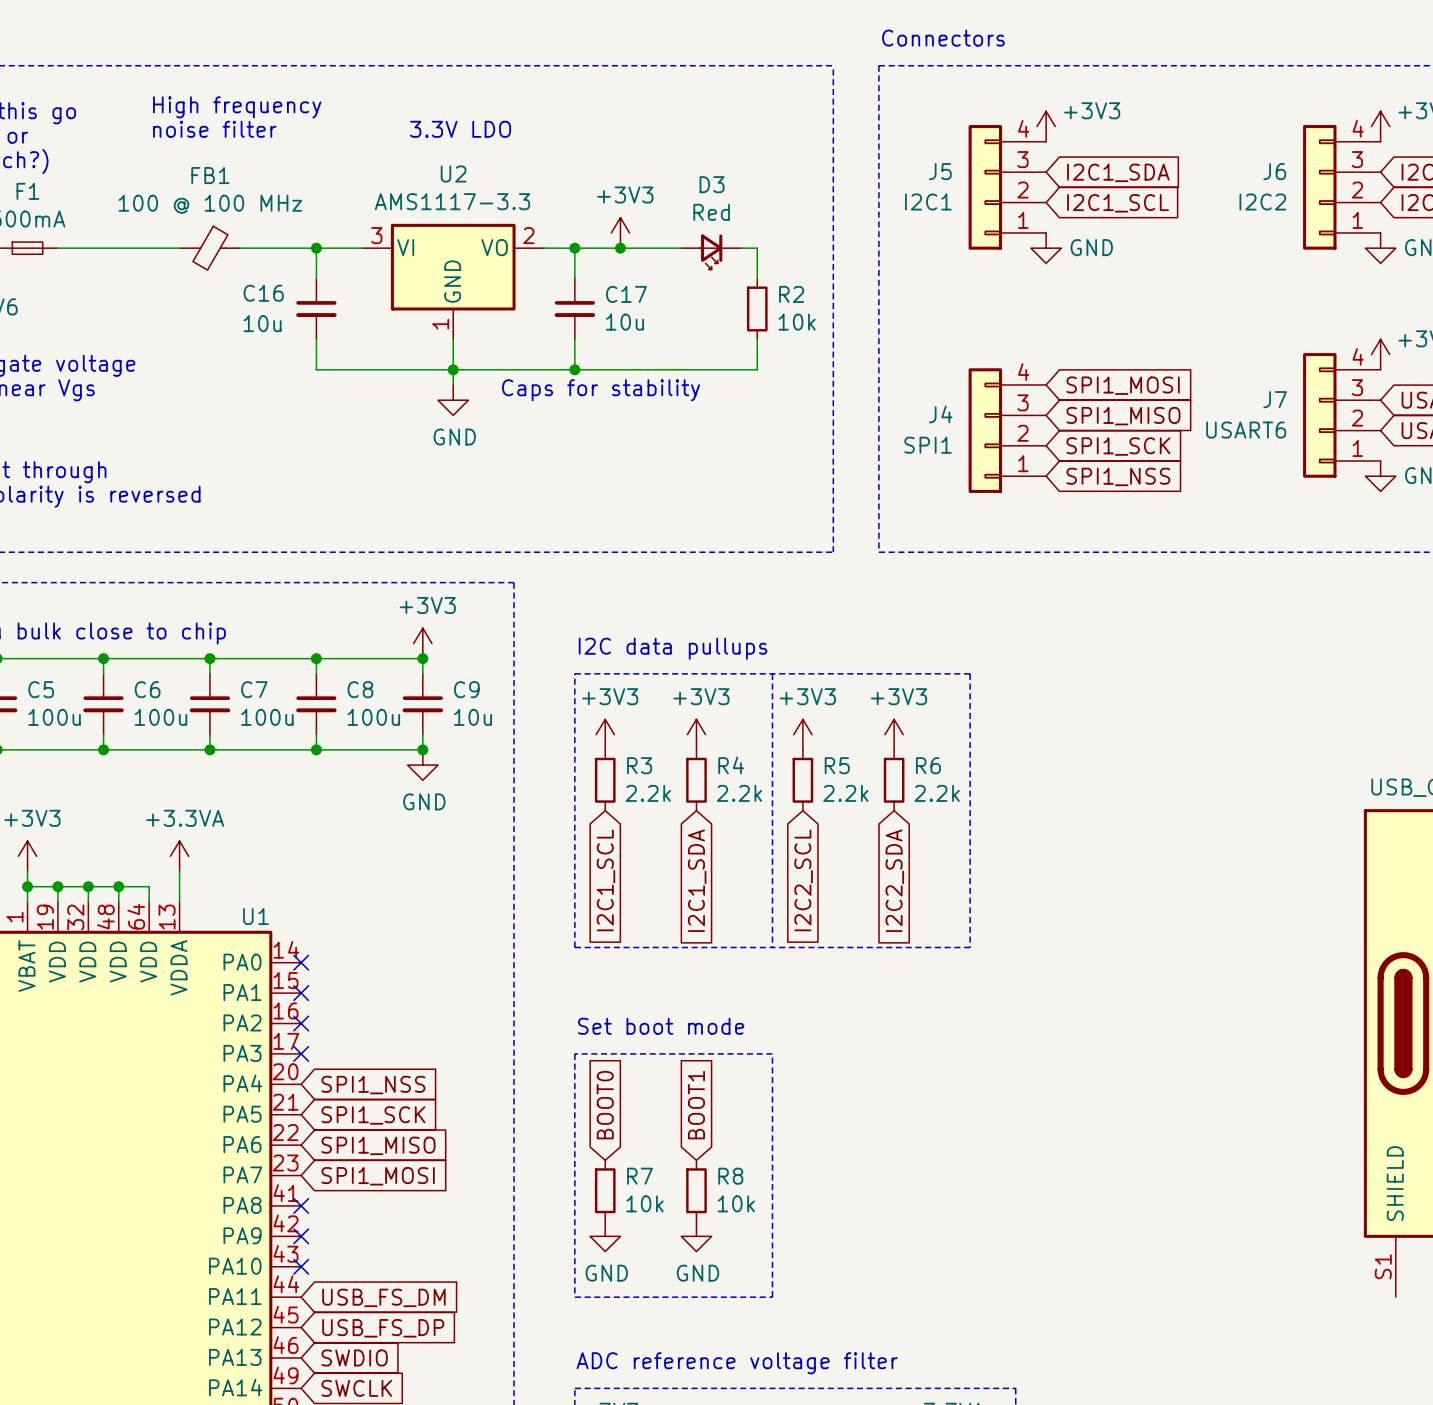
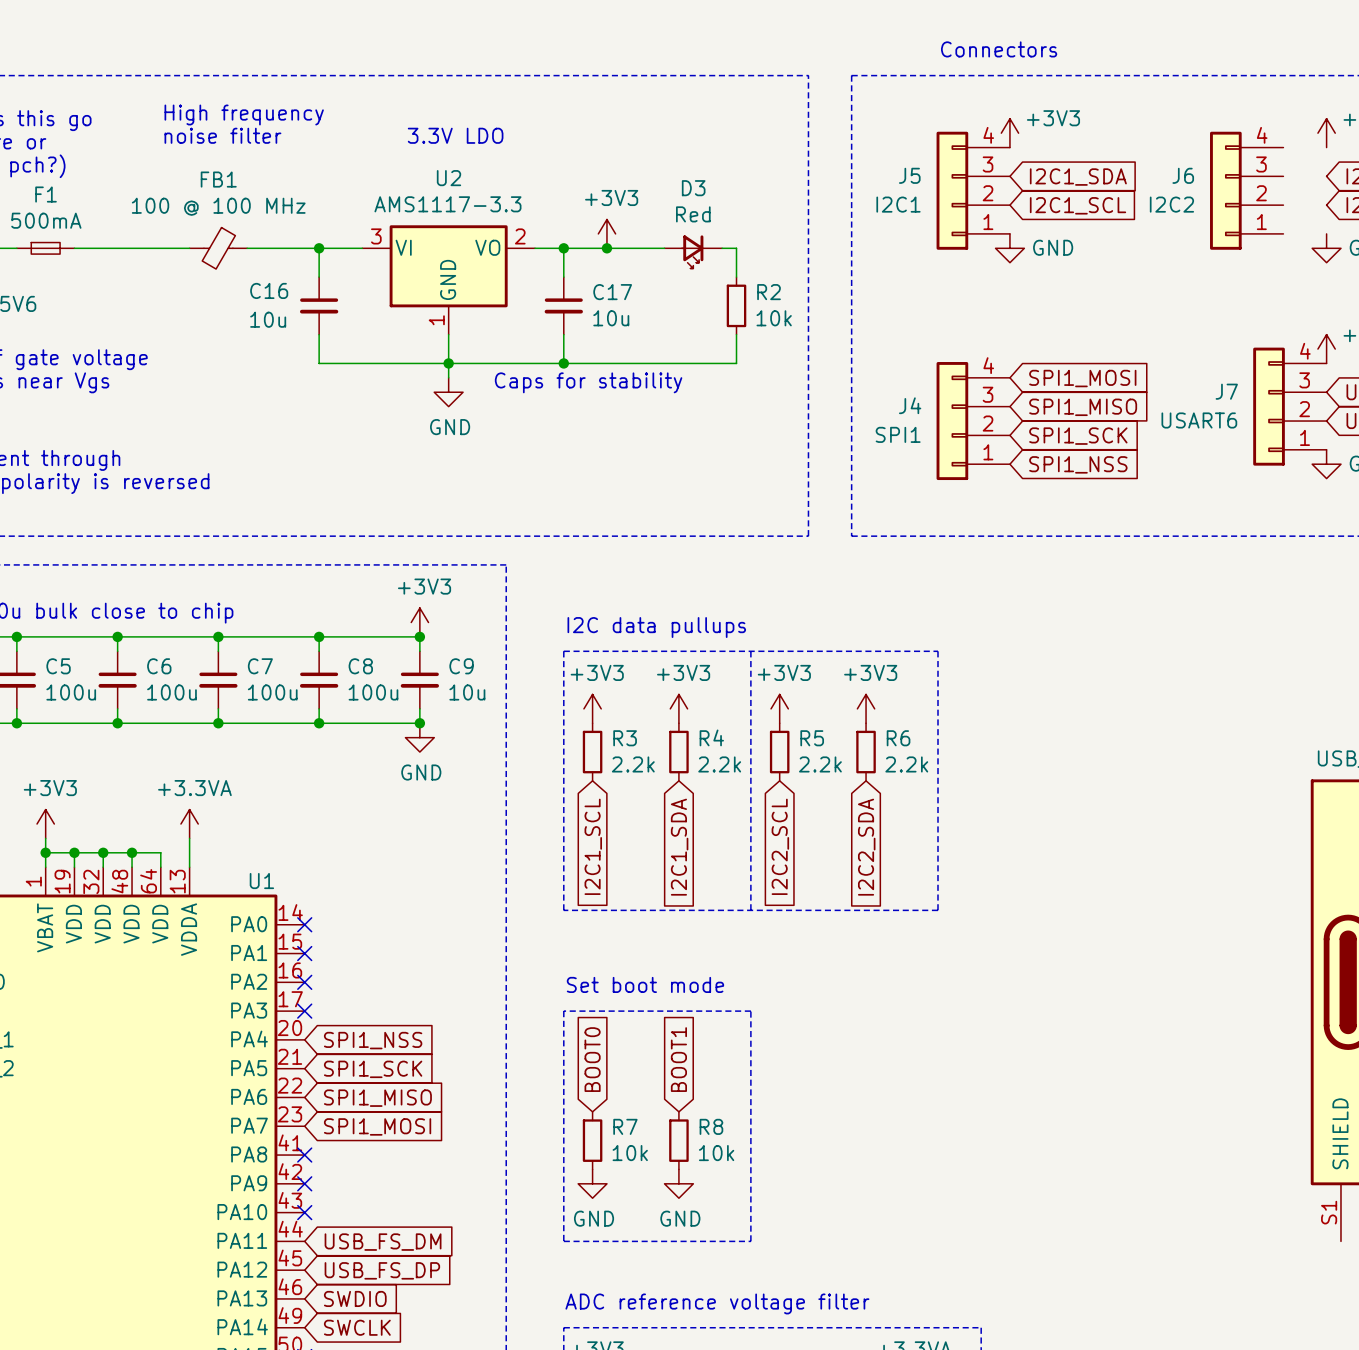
text position: Connectors (943, 38) -> Connectors (999, 49)
J6 position: (1341, 187) -> (1246, 190)

